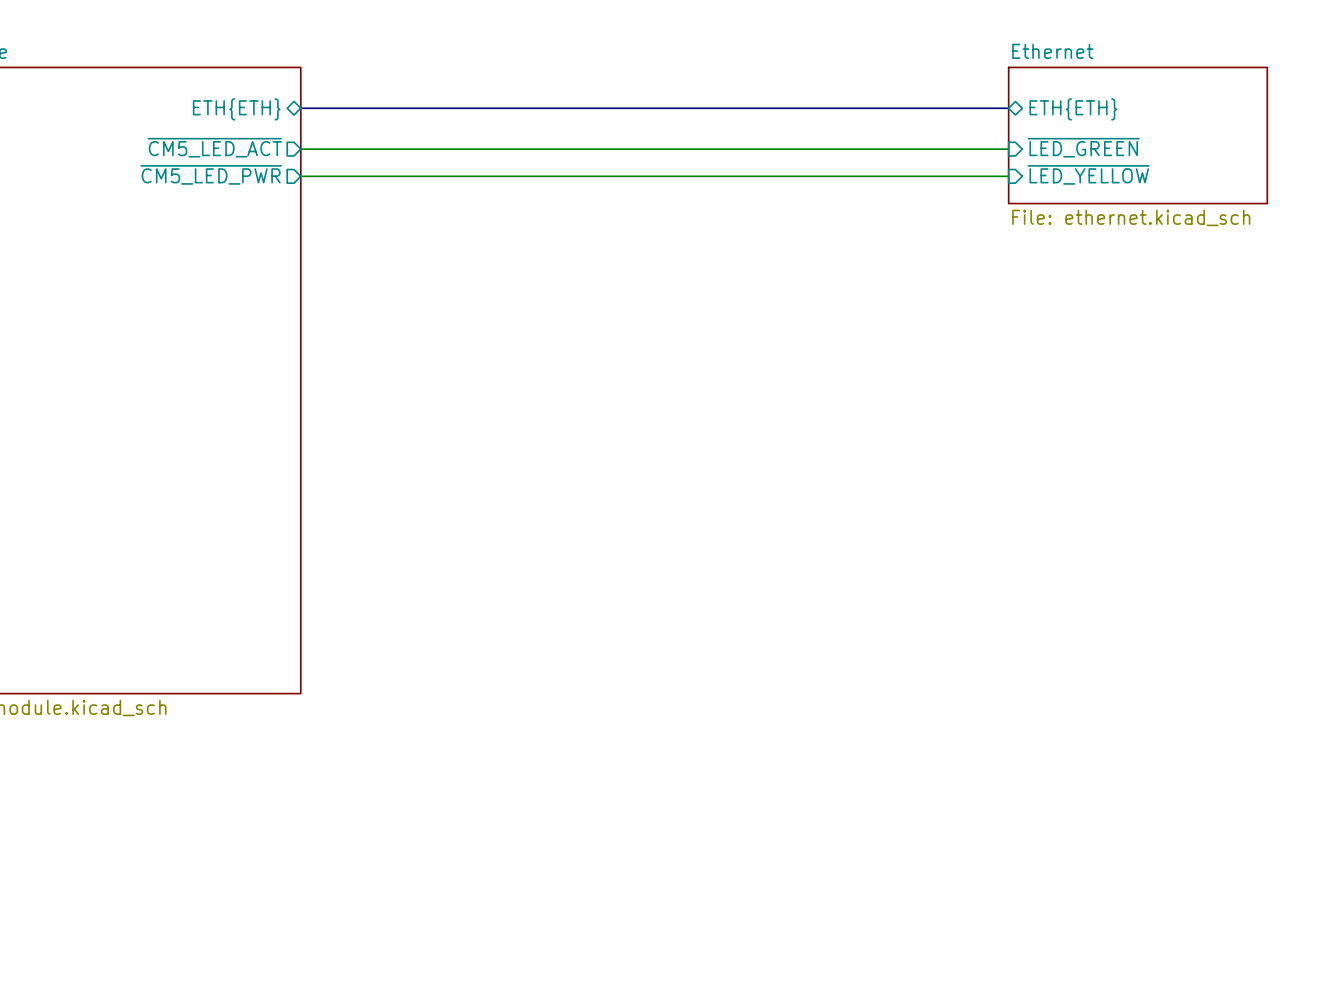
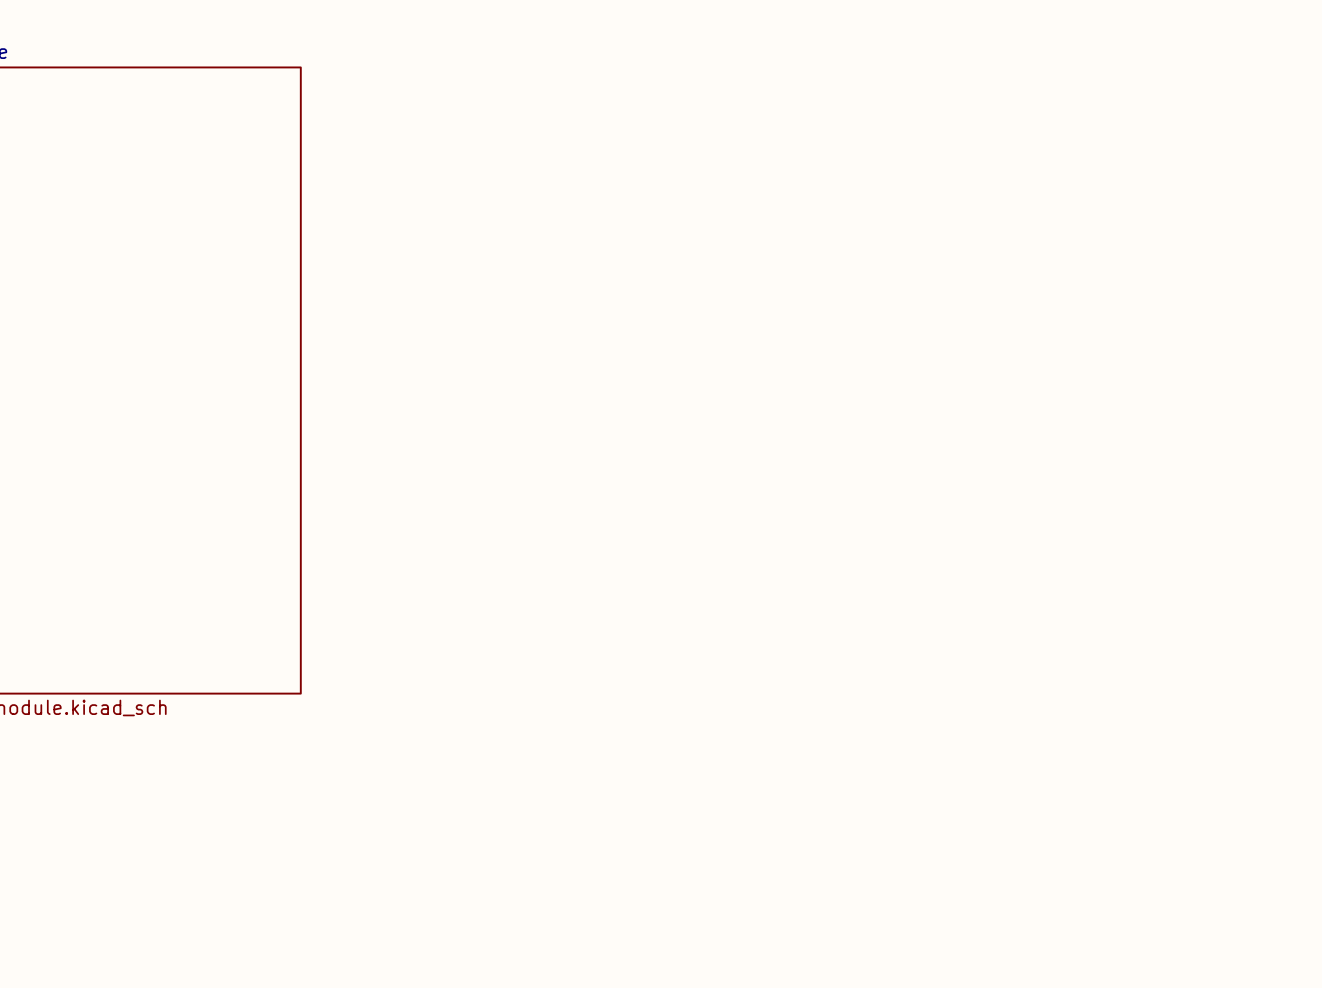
bus: (300, 108) (1008, 108) -> none
sheet pin: ETH{ETH} (236, 109) -> none
sheet pin: ETH{ETH} (1073, 109) -> none
sheet Ethernet: File: ethernet.kicad_sch (1137, 135) -> none
sheet pin: ~{CM5_LED_ACT} (214, 147) -> none
sheet pin: ~{LED_GREEN} (1083, 147) -> none
wire: (300, 149) (1008, 149) -> none
sheet pin: ~{CM5_LED_PWR} (211, 174) -> none
sheet pin: ~{LED_YELLOW} (1088, 174) -> none
wire: (300, 176) (1008, 176) -> none

